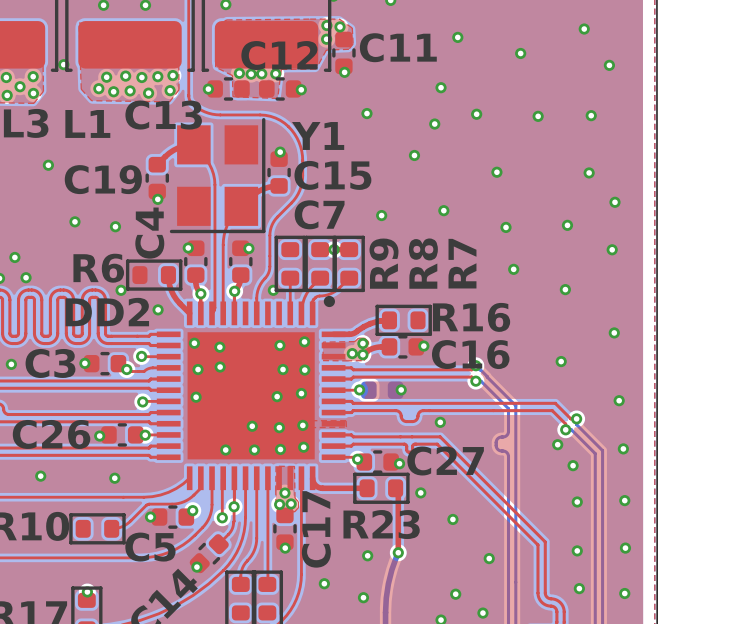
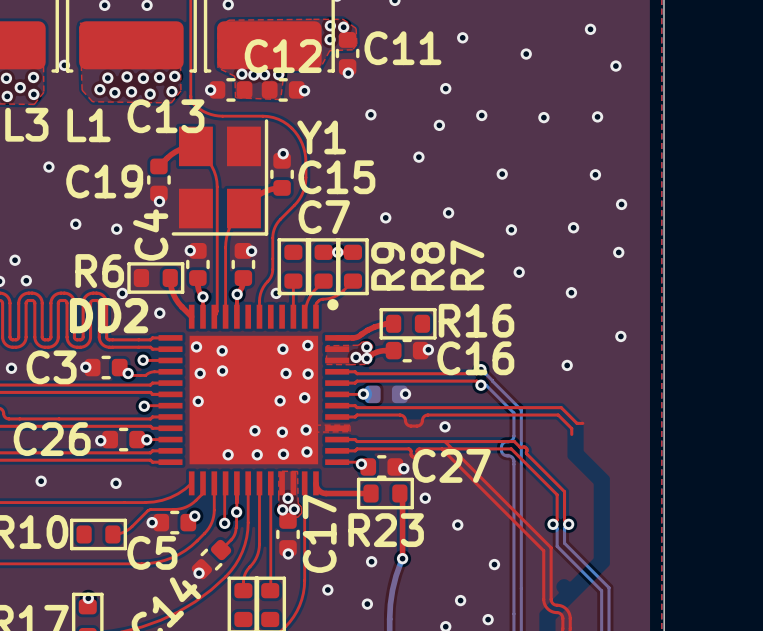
via: (619, 400) -> none
bottom track: (576, 418) (576, 424) (602, 450) (602, 581) -> (568, 524) (564, 528) (564, 543) (609, 587)
via: (576, 418) -> none
bottom track: (565, 429) (571, 429) (595, 453) (595, 584) -> (553, 524) (557, 528) (557, 546) (601, 590)
via: (565, 429) -> none
top track: none -> (444, 441) (514, 441) (520, 447) (524, 446) (527, 449) (526, 453) (564, 491) (564, 520) (568, 524)
top track: none -> (441, 448) (511, 448) (557, 494) (557, 520) (553, 524)
via: (557, 444) -> none
via: (623, 448) -> none
via: (573, 465) -> none
via: (624, 500) -> none
via: (577, 501) -> none
via: none -> (553, 524)
via: none -> (568, 524)
via: (625, 548) -> none
via: (577, 550) -> none
via: (579, 588) -> none
via: (624, 593) -> none

